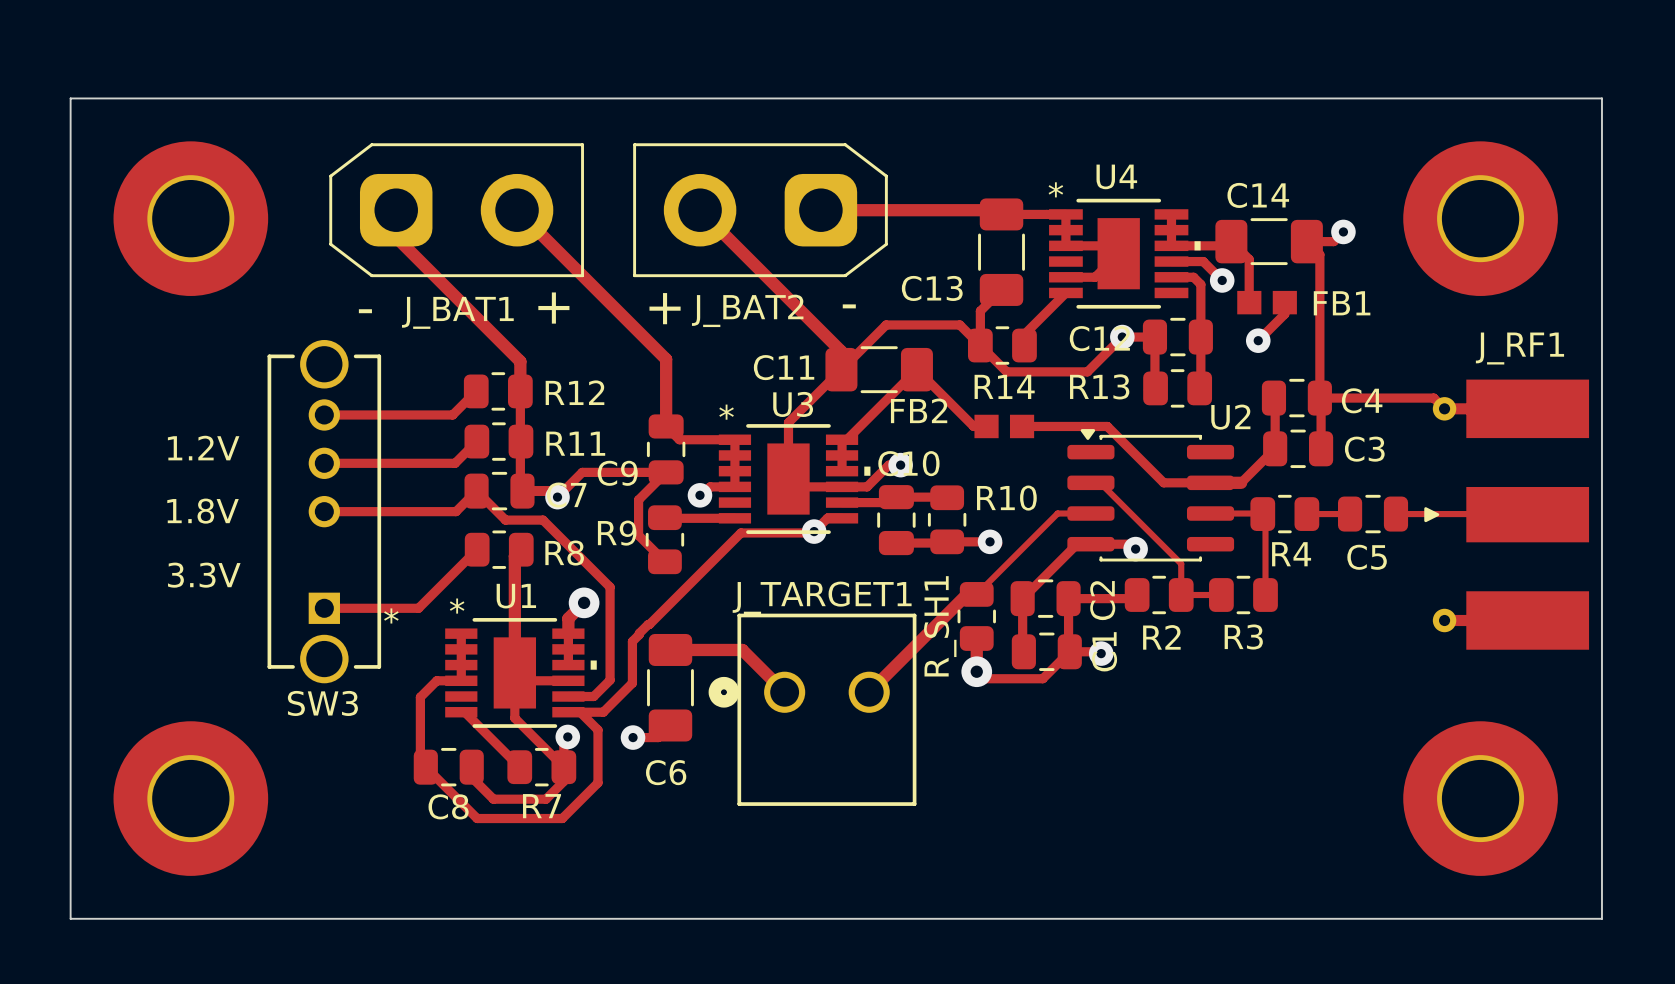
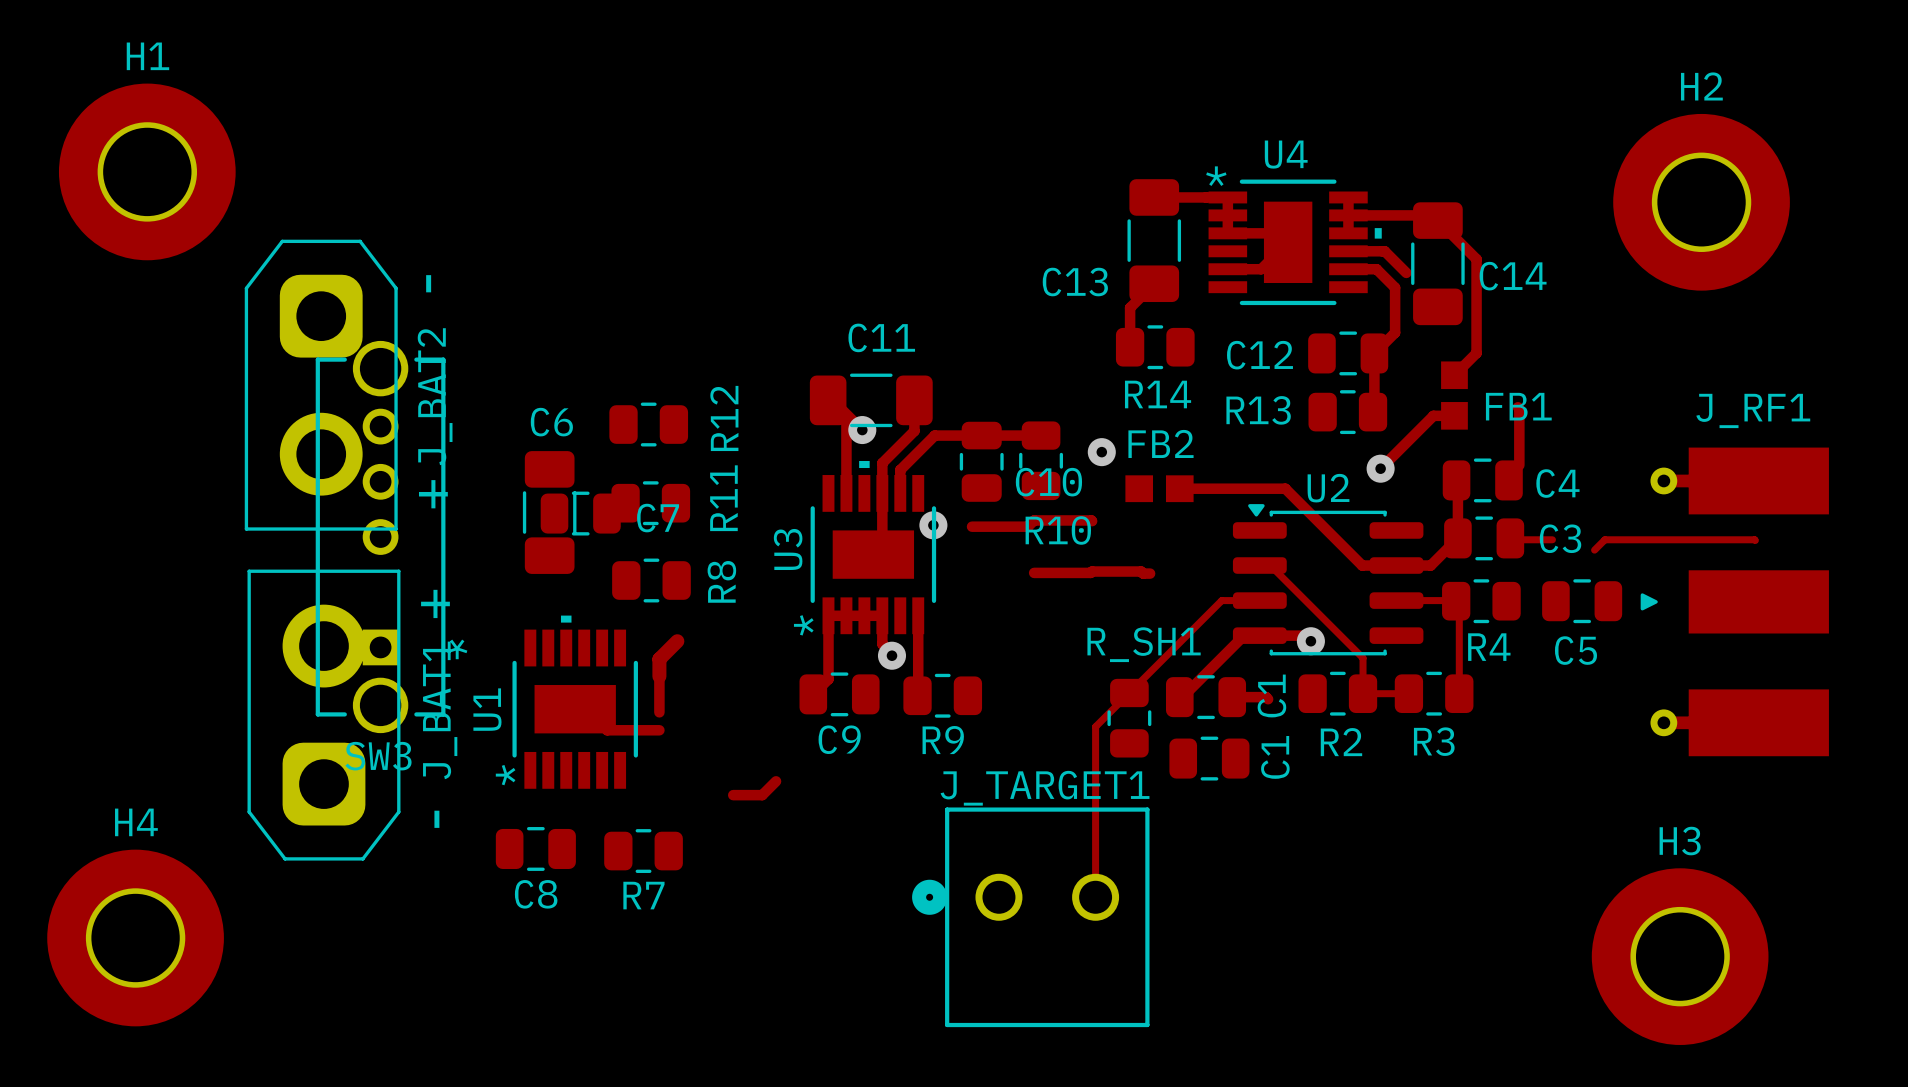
board edge: (70, 98) (1601, 98) (1601, 918) (70, 918) (70, 98) -> none
H2 name: none -> H2 (1701, 86)
H1: none -> (147, 171)
track: (396, 210) (396, 237) (520, 361) (520, 488) (522, 491) (563, 491) (582, 472) (666, 472) (638, 499) (638, 535) (664, 561) -> none
J_BAT1 rotation: 0° (456, 210) -> 90° counterclockwise (323, 715)
J_BAT1 position: (456, 210) -> (323, 715)
track: (517, 210) (666, 359) (666, 426) (679, 439) (734, 439) (734, 486) (710, 486) (699, 495) -> none
track: (700, 210) (841, 351) (841, 369) -> none
J_BAT2 rotation: 0° (760, 210) -> 90° counterclockwise (321, 385)
J_BAT2 position: (760, 210) -> (321, 385)
track: (820, 210) (997, 210) (1001, 214) -> none
part: (190, 218) -> none
track: none -> (1348, 215) (1432, 215) (1476, 259) (1476, 353) (1454, 375)
track: (1343, 231) (1333, 241) (1306, 241) (1319, 254) (1319, 398) (1433, 398) (1444, 408) -> none
via: (1343, 231) -> none
C14 rotation: 0° (1269, 241) -> 90° clockwise (1437, 263)
track: (1171, 245) (1227, 245) (1231, 241) (1249, 259) (1249, 302) -> none
track: (1193, 277) (1200, 284) (1199, 388) -> (1373, 269) (1376, 269) (1395, 287) (1395, 332) (1374, 353) (1373, 412)
via: (1222, 280) -> none
track: (1065, 292) (1024, 334) (1024, 344) -> none
FB1 rotation: 0° (1267, 302) -> 90° clockwise (1454, 395)
FB1 position: (1267, 302) -> (1454, 395)
track: (1284, 302) (1284, 314) (1258, 340) -> none
via: (1122, 337) -> none
C12 position: (1177, 337) -> (1348, 353)
via: (1258, 340) -> none
C11 name position: C11 (784, 367) -> C11 (881, 337)
C11 position: (879, 369) -> (871, 400)
track: (1154, 387) (1154, 337) (1122, 337) (1087, 371) (1006, 371) (959, 324) (886, 324) (788, 422) (788, 479) (796, 486) (867, 486) (888, 465) (900, 465) -> none
R13 position: (1177, 388) -> (1347, 412)
track: (476, 391) (452, 414) (324, 414) -> none
R12 position: (498, 391) -> (648, 424)
R12 name rotation: 0° (575, 392) -> 90° counterclockwise (724, 418)
track: none -> (914, 400) (914, 431) (882, 463) (882, 545) (873, 554)
track: (1273, 398) (1275, 448) (1241, 482) (1163, 482) (1107, 426) (1022, 426) -> none
C4 position: (1296, 398) -> (1482, 480)
track: none -> (1454, 415) (1433, 415) (1380, 468)
FB2 name position: FB2 (919, 410) -> FB2 (1160, 443)
U2 name position: U2 (1230, 417) -> U2 (1328, 488)
track: none -> (862, 430) (832, 400) (828, 400) (846, 418) (846, 493)
via: none -> (862, 430)
track: none -> (1041, 435) (934, 435) (900, 470) (900, 493)
track: (986, 426) (973, 426) (916, 369) (846, 439) (842, 439) (842, 470) -> none
FB2 position: (1004, 426) -> (1159, 488)
via: none -> (1101, 452)
track: (476, 441) (455, 463) (324, 463) -> none
R11 position: (498, 441) -> (650, 503)
R11 name rotation: 0° (575, 443) -> 90° counterclockwise (723, 498)
text: 1.2V (203, 448) -> none
C3 position: (1298, 448) -> (1484, 538)
C9 rotation: 0° (666, 449) -> 90° clockwise (839, 694)
C9 position: (666, 449) -> (839, 694)
via: none -> (1380, 468)
track: none -> (1456, 480) (1457, 538) (1430, 565) (1362, 565) (1285, 488) (1179, 488)
via: (900, 465) -> none
C9 name position: C9 (617, 473) -> C9 (839, 739)
U3 rotation: 0° (794, 479) -> 90° counterclockwise (873, 547)
track: (1090, 482) (1100, 482) (1181, 563) (1181, 595) (1221, 595) -> (1259, 565) (1270, 565) (1363, 658) (1363, 693) (1408, 693)
via: (699, 495) -> none
U2 position: (1150, 495) -> (1328, 579)
via: (557, 497) -> none
R10 name position: R10 (1006, 498) -> R10 (1058, 530)
text: 1.8V (203, 511) -> none
track: (324, 511) (456, 511) (476, 491) (505, 520) (543, 520) (610, 587) (610, 680) (593, 696) (568, 696) -> none
track: (1090, 513) (1057, 513) (976, 594) (967, 594) (869, 692) -> none
track: (1210, 513) (1262, 513) (1265, 516) (1265, 595) -> (1396, 600) (1455, 600) (1459, 604) (1459, 693)
R4 position: (1284, 514) -> (1481, 601)
C5 position: (1373, 514) -> (1582, 601)
J_RF1 position: (1506, 514) -> (1734, 601)
track: (664, 517) (734, 518) -> none
track: (842, 518) (827, 518) (812, 532) (740, 532) (632, 641) (632, 683) (603, 712) (568, 712) -> none
R10 position: (947, 519) -> (1041, 460)
C10 position: (896, 520) -> (981, 461)
via position: (814, 531) -> (933, 525)
R9 name position: R9 (617, 533) -> R9 (943, 740)
R9 rotation: 0° (664, 539) -> 90° clockwise (942, 695)
R9 position: (664, 539) -> (942, 695)
via: (990, 541) -> none
track: (477, 549) (418, 608) (324, 608) -> none
R8 position: (499, 549) -> (651, 580)
track: (521, 549) (514, 556) (514, 718) (563, 767) -> none
track: (1135, 549) (1130, 544) (1077, 544) (1022, 598) (1023, 651) -> none
via: (1135, 549) -> none
R8 name rotation: 0° (564, 553) -> 90° counterclockwise (721, 581)
track: none -> (1259, 600) (1221, 600) (1095, 726) (1095, 897)
text: 3.3V (204, 575) -> none
track: none -> (918, 615) (917, 695)
track: (1137, 595) (1133, 598) (1068, 598) (1069, 651) -> none
R2 position: (1159, 595) -> (1337, 693)
R3 position: (1243, 595) -> (1434, 693)
C2: (1045, 598) -> none
via: (584, 602) -> none
track: none -> (1310, 641) (1305, 635) (1244, 635) (1181, 697)
via: none -> (1310, 641)
track: none -> (891, 655) (882, 644) (882, 615) (828, 615) (828, 679) (813, 694)
via: none -> (891, 655)
R_SH1 position: (976, 616) -> (1129, 718)
R_SH1 name rotation: 0° (940, 626) -> 90° clockwise (1144, 644)
track: (461, 633) (461, 680) (436, 680) (420, 697) (420, 761) (477, 818) (562, 818) (597, 782) (597, 730) (580, 712) -> none
track: (976, 638) (976, 671) (983, 678) (1042, 678) (1069, 651) -> none
track: (670, 649) (742, 649) (784, 692) -> none
via: (1101, 653) -> none
via: (976, 671) -> none
U1 rotation: 0° (520, 672) -> 90° counterclockwise (575, 702)
C6 position: (670, 687) -> (549, 512)
C1: none -> (1209, 758)
J_TARGET1 position: (812, 709) -> (1030, 917)
track: (461, 712) (464, 712) (519, 767) (521, 765) -> none
track: (567, 736) (563, 740) (563, 781) (546, 799) (493, 799) (471, 777) (471, 767) -> none
via: (567, 736) -> none
via: (633, 737) -> none
C8 position: (448, 767) -> (535, 848)
R7 position: (541, 767) -> (643, 851)
C6 name position: C6 (666, 772) -> C6 (551, 422)
part: (190, 798) -> none
part: (1480, 798) -> none
H4: none -> (135, 938)
H3: none -> (1680, 956)

